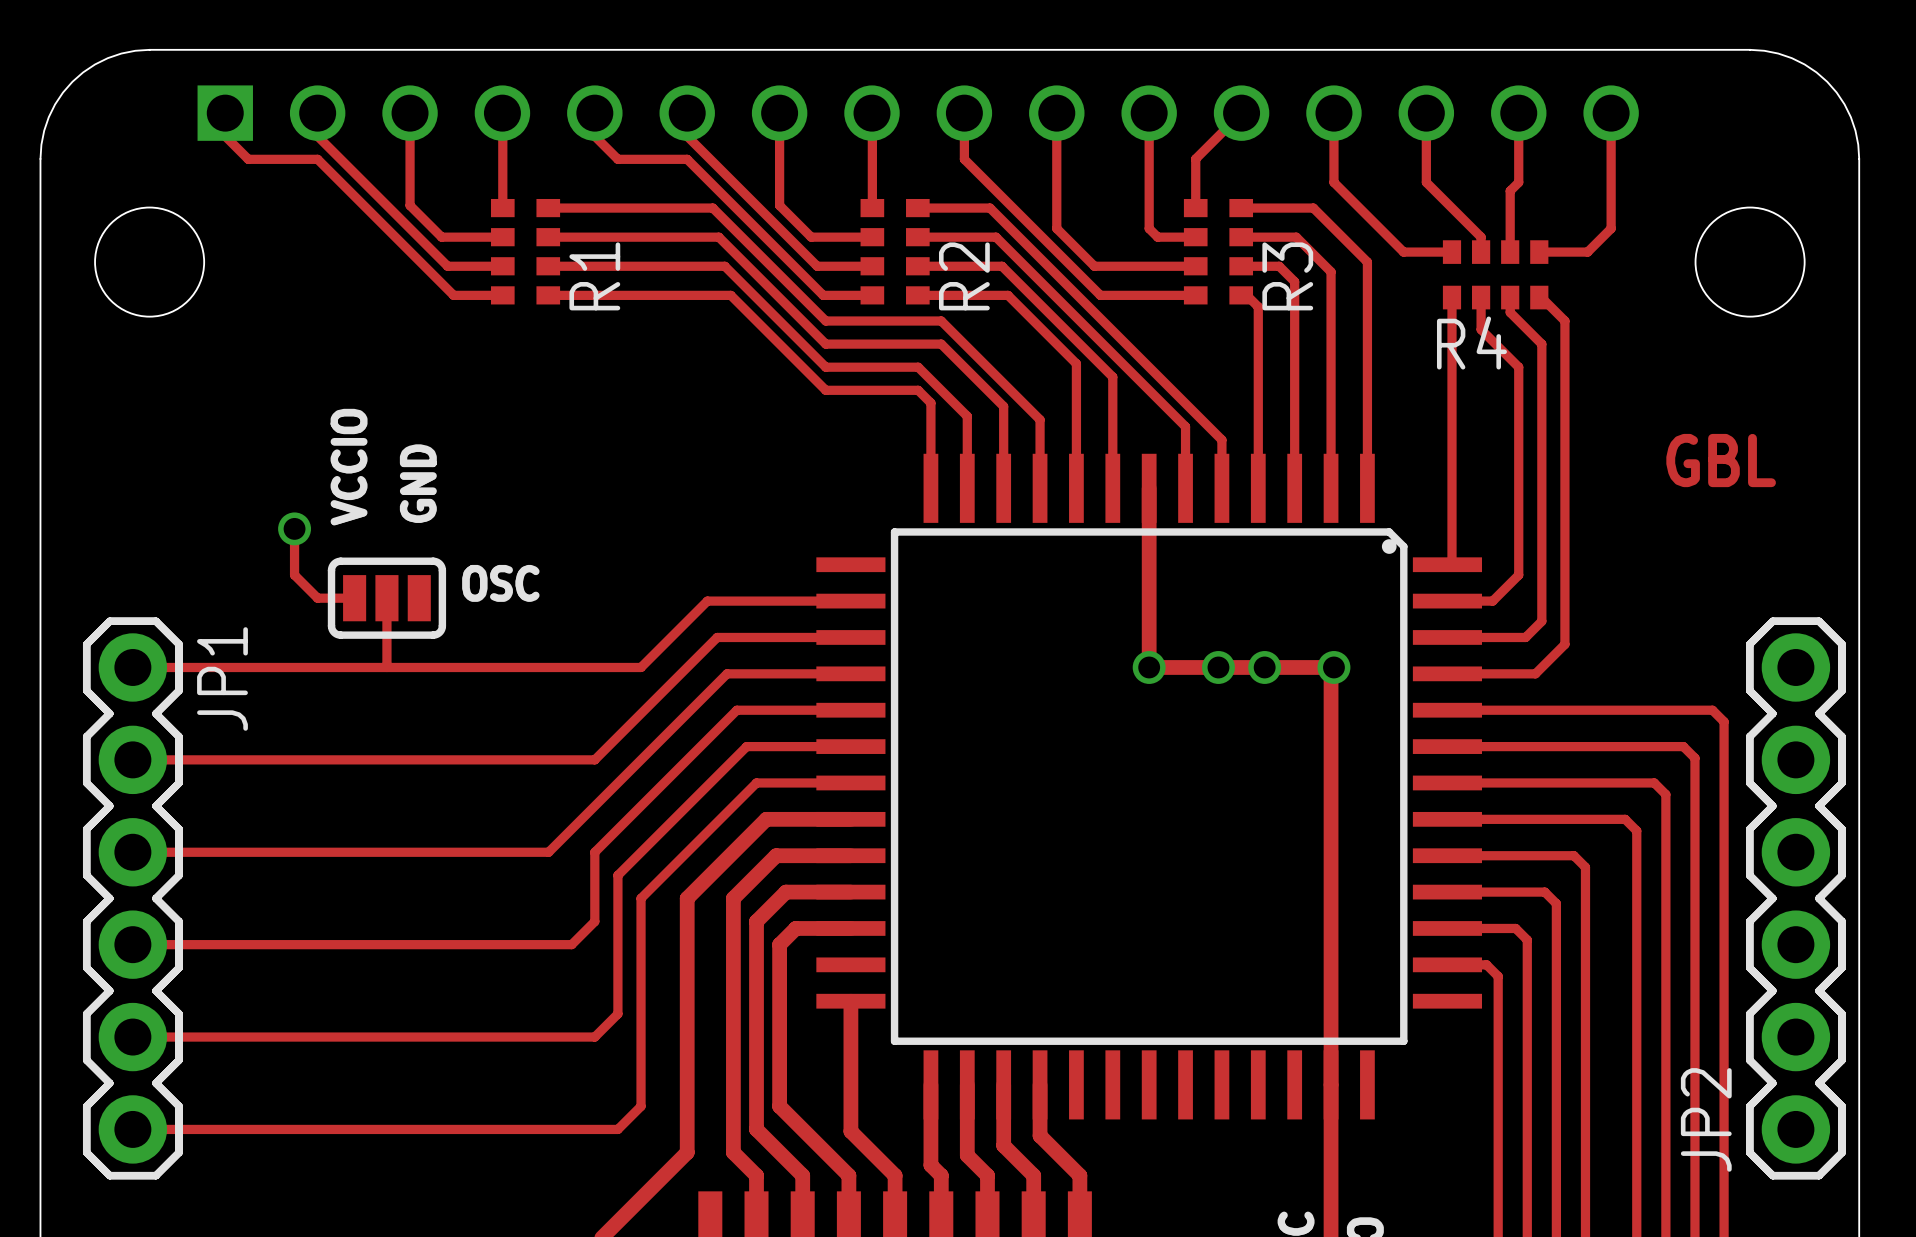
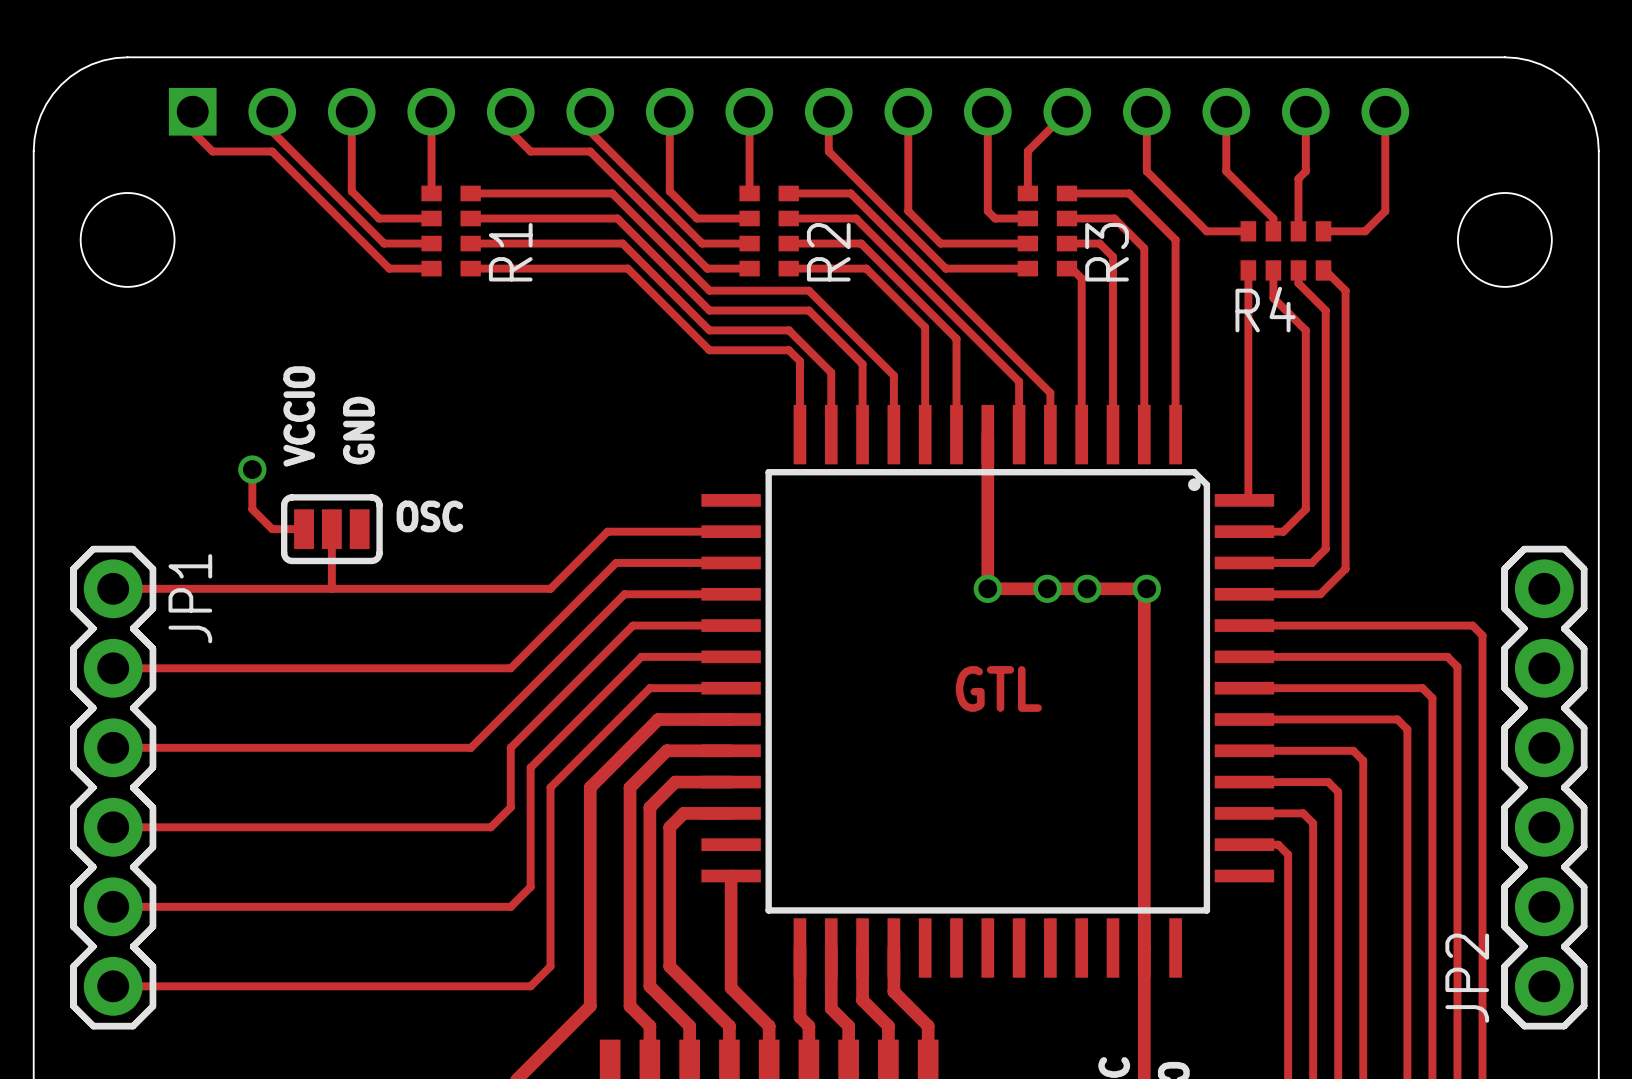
text: GBL (1721, 460) -> none
text: none -> GTL (998, 688)

